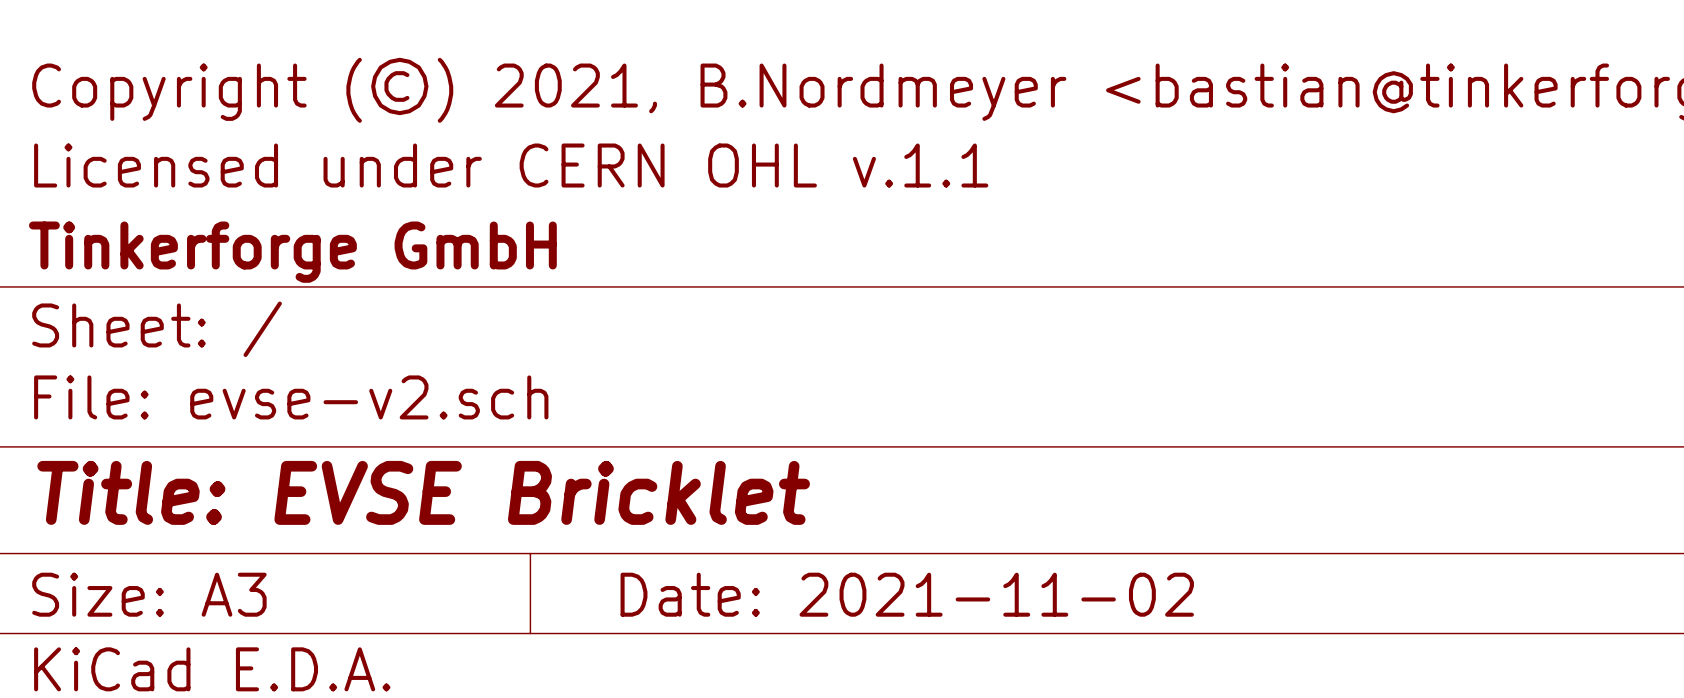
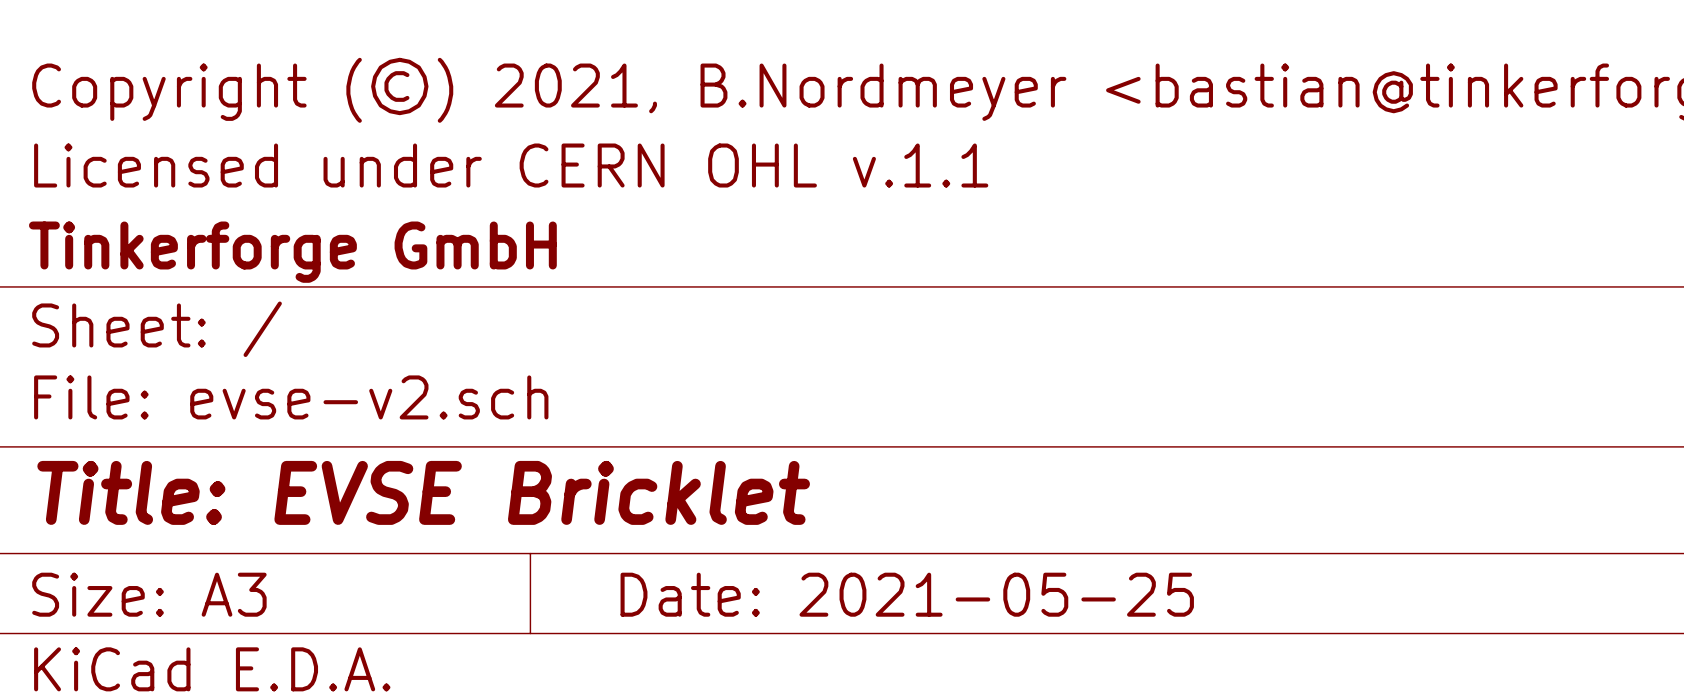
title block: Date: 2021-11-02 (907, 594) -> Date: 2021-05-25 (907, 594)

